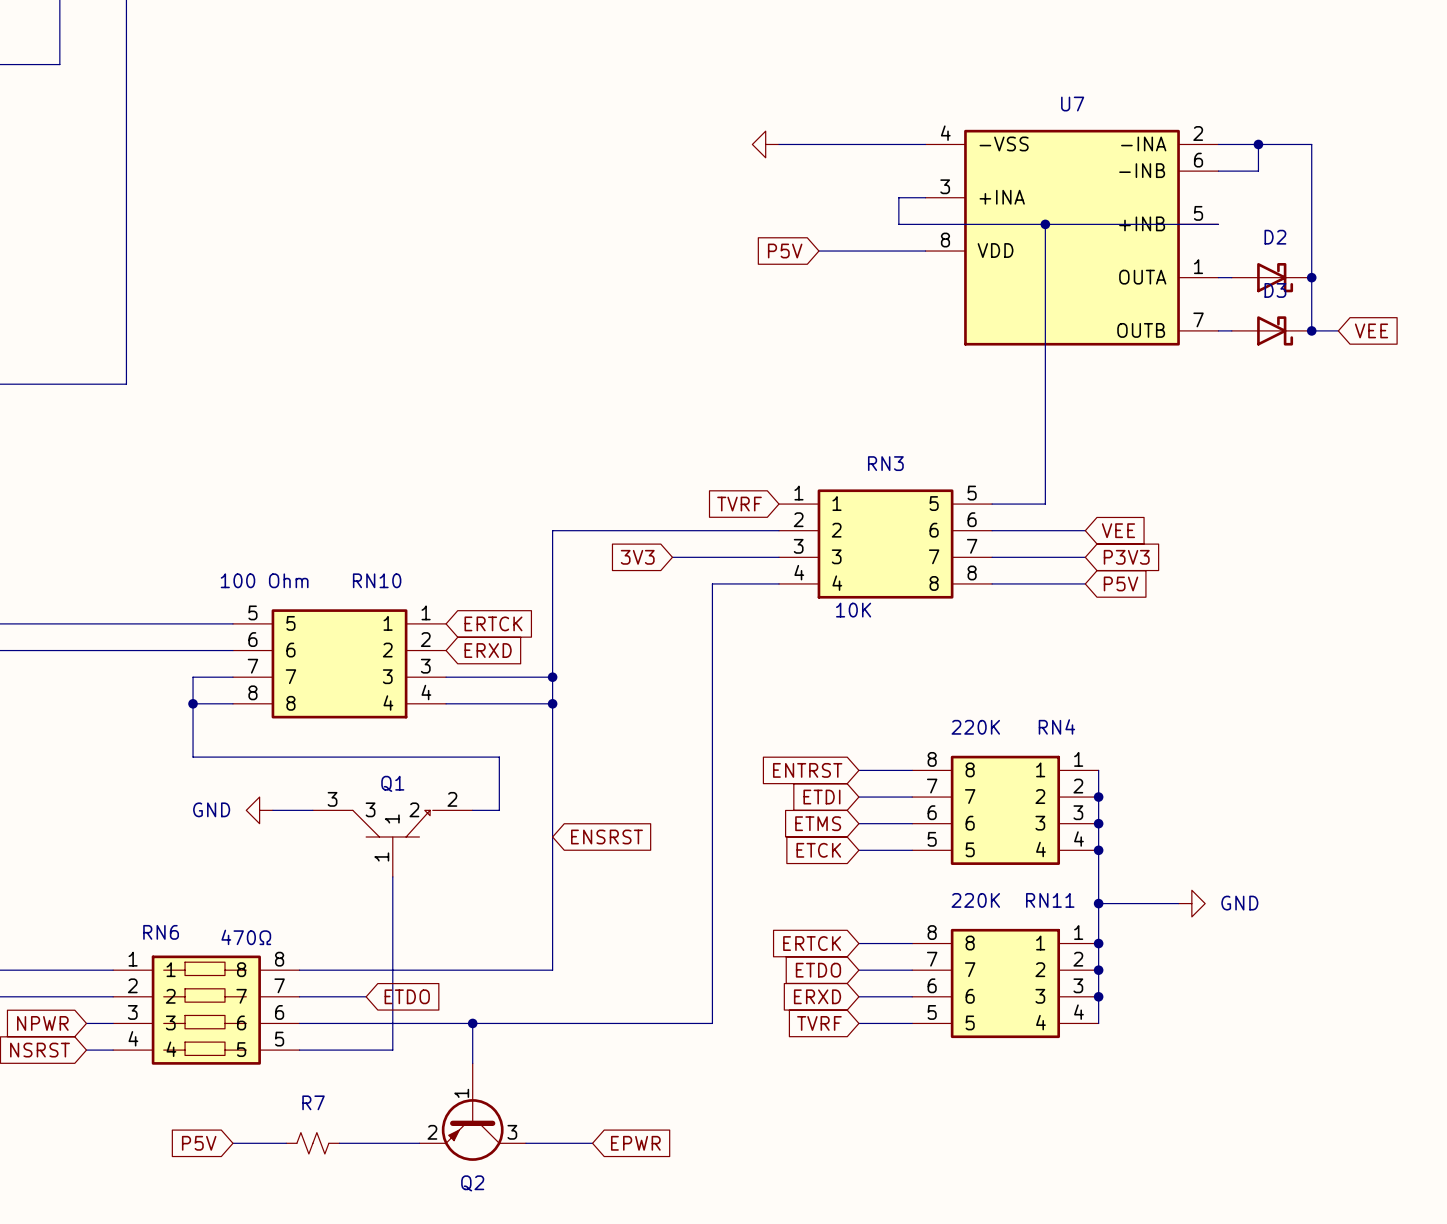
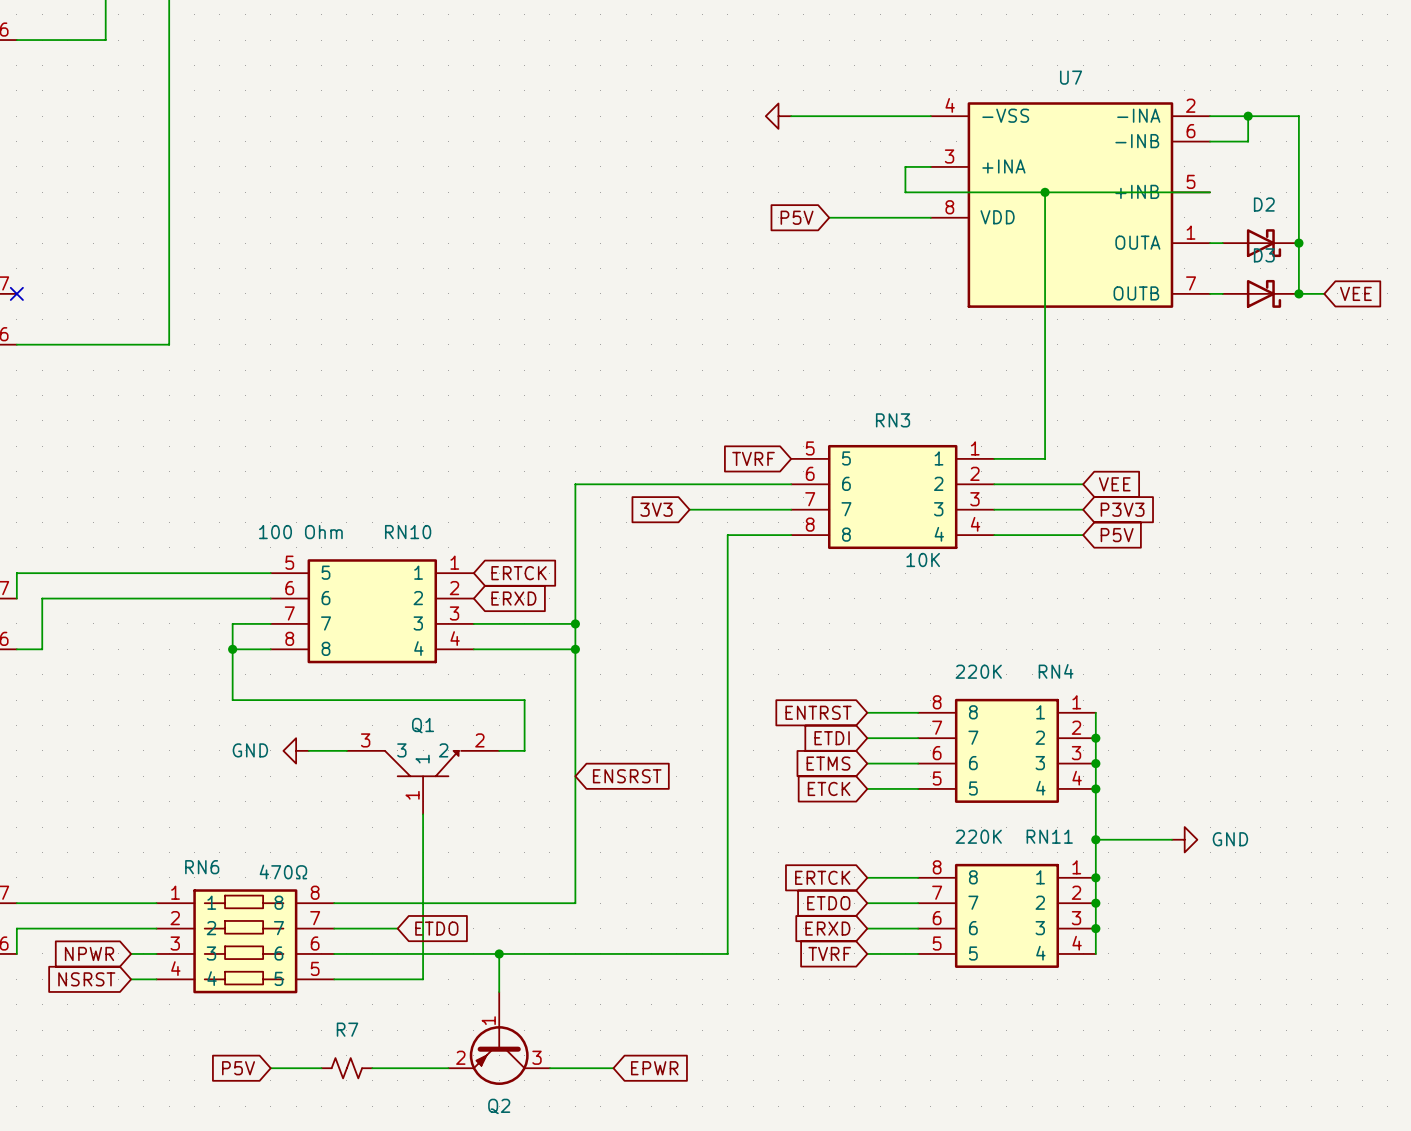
RN3 flip: as is (885, 544) -> left-right (892, 497)

